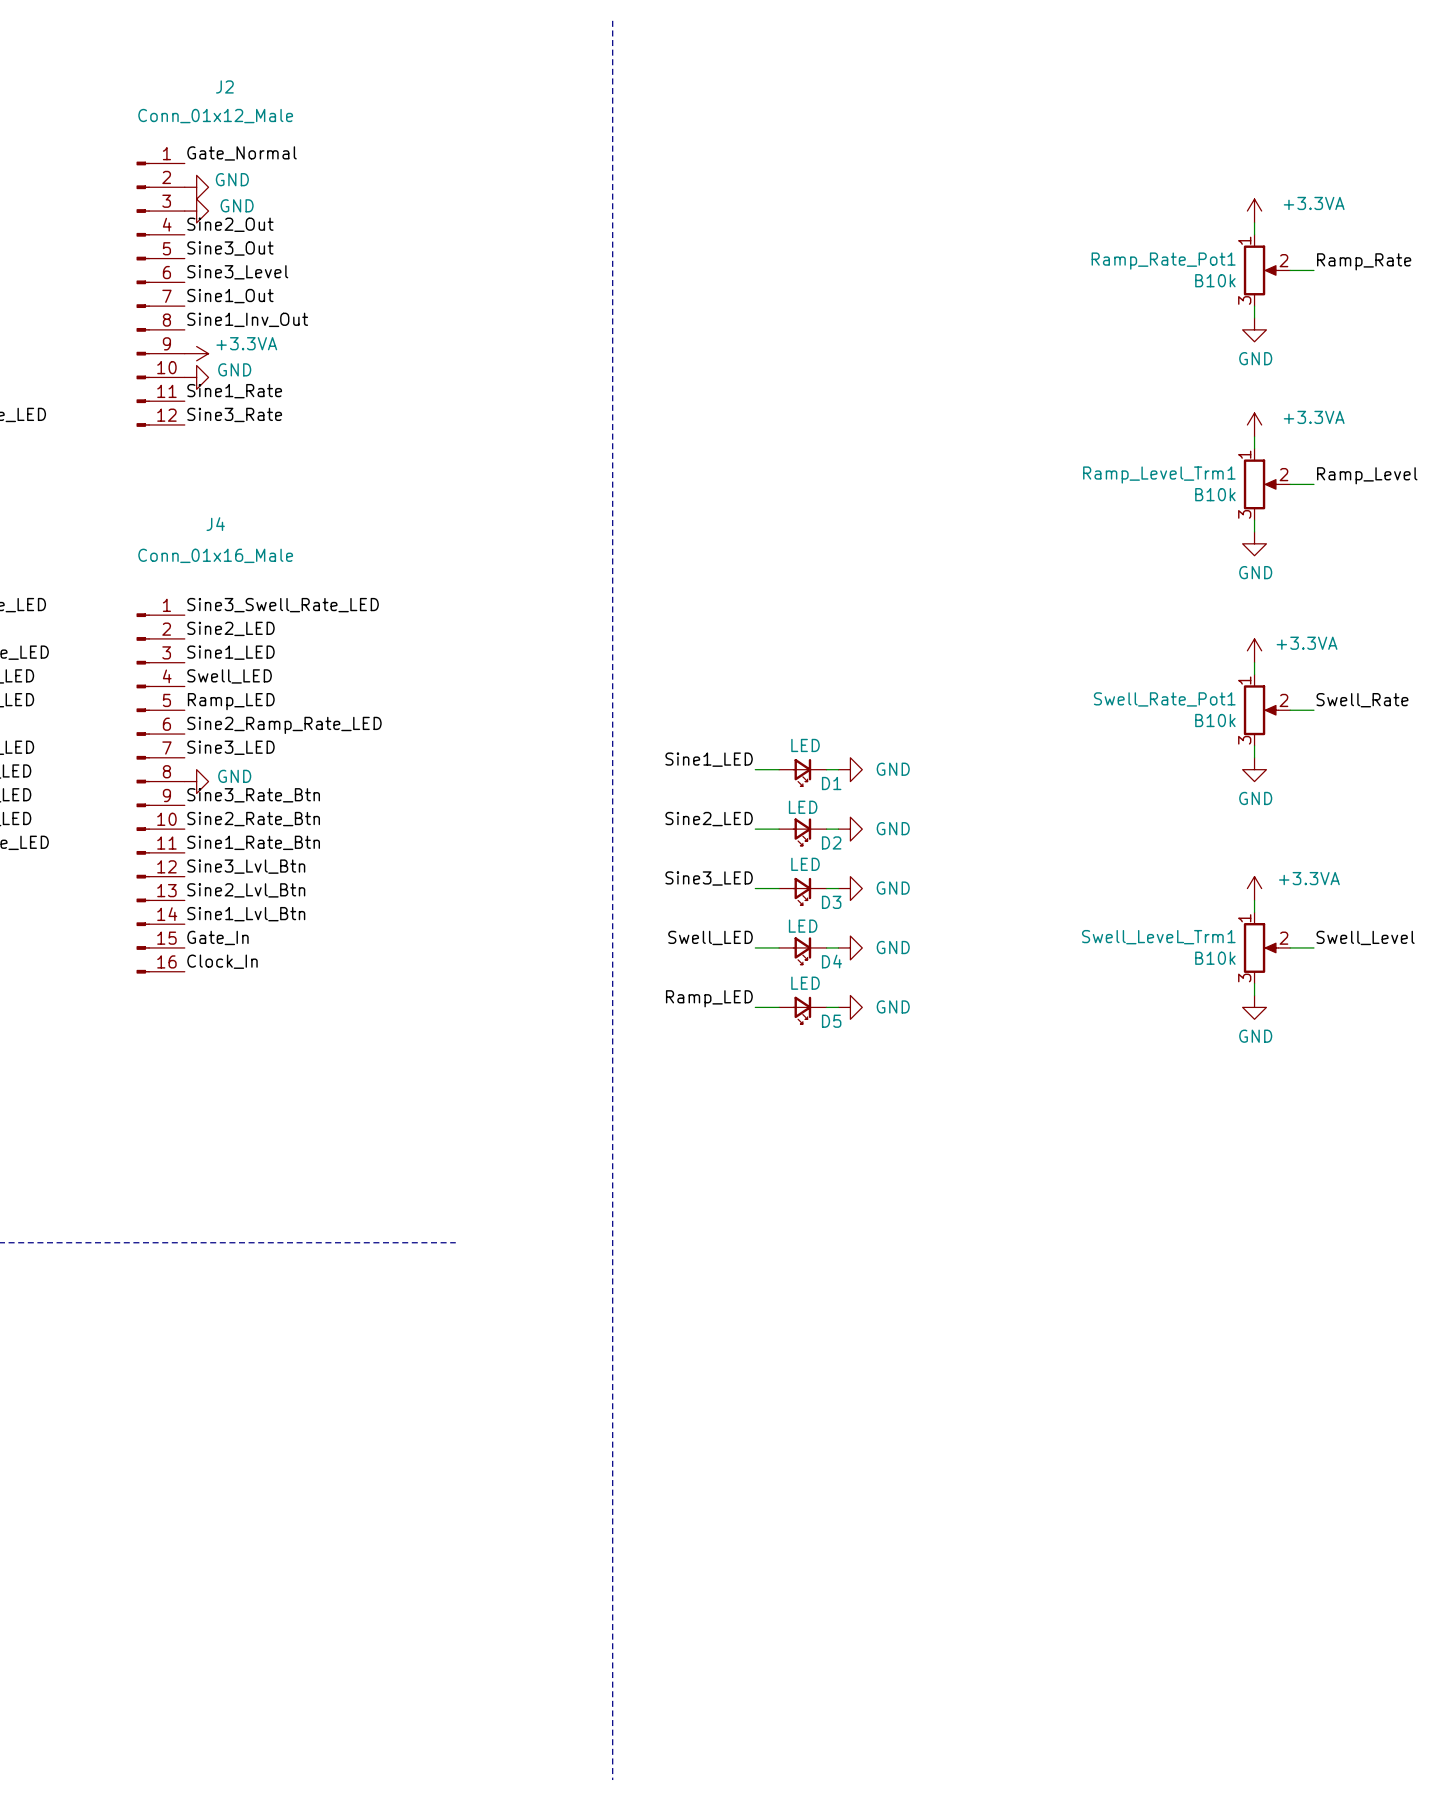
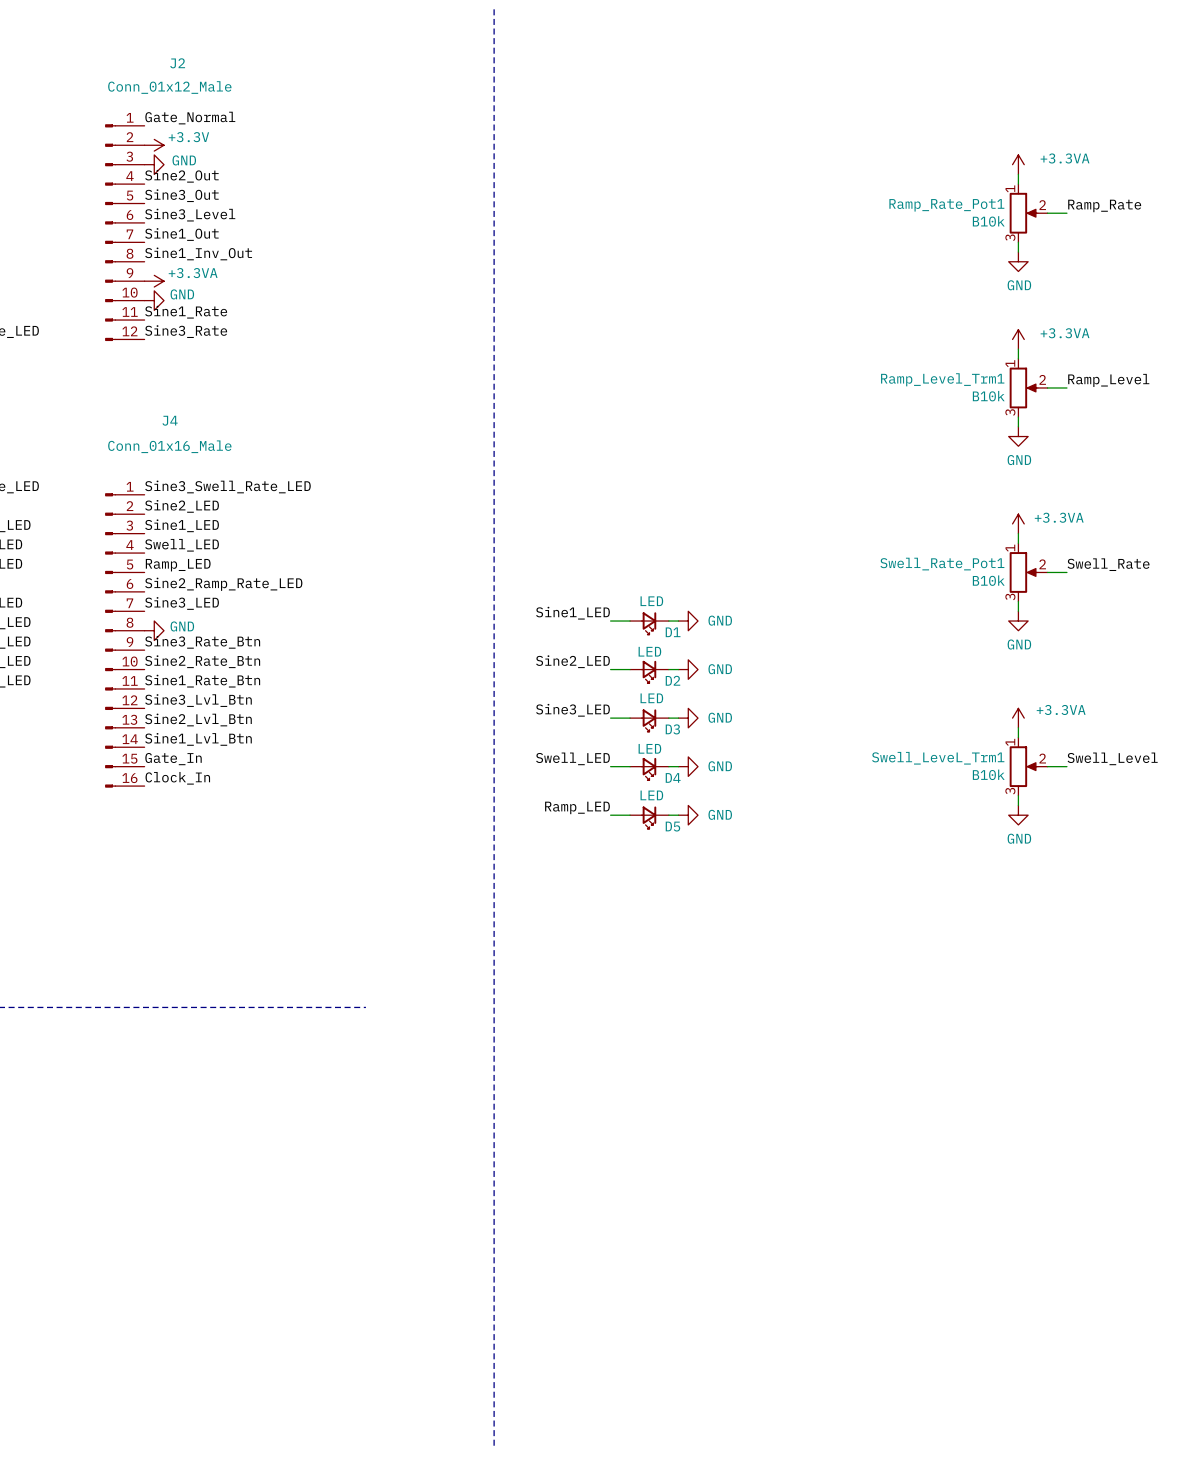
power symbol: GND (196, 187) -> +3.3V (154, 145)

